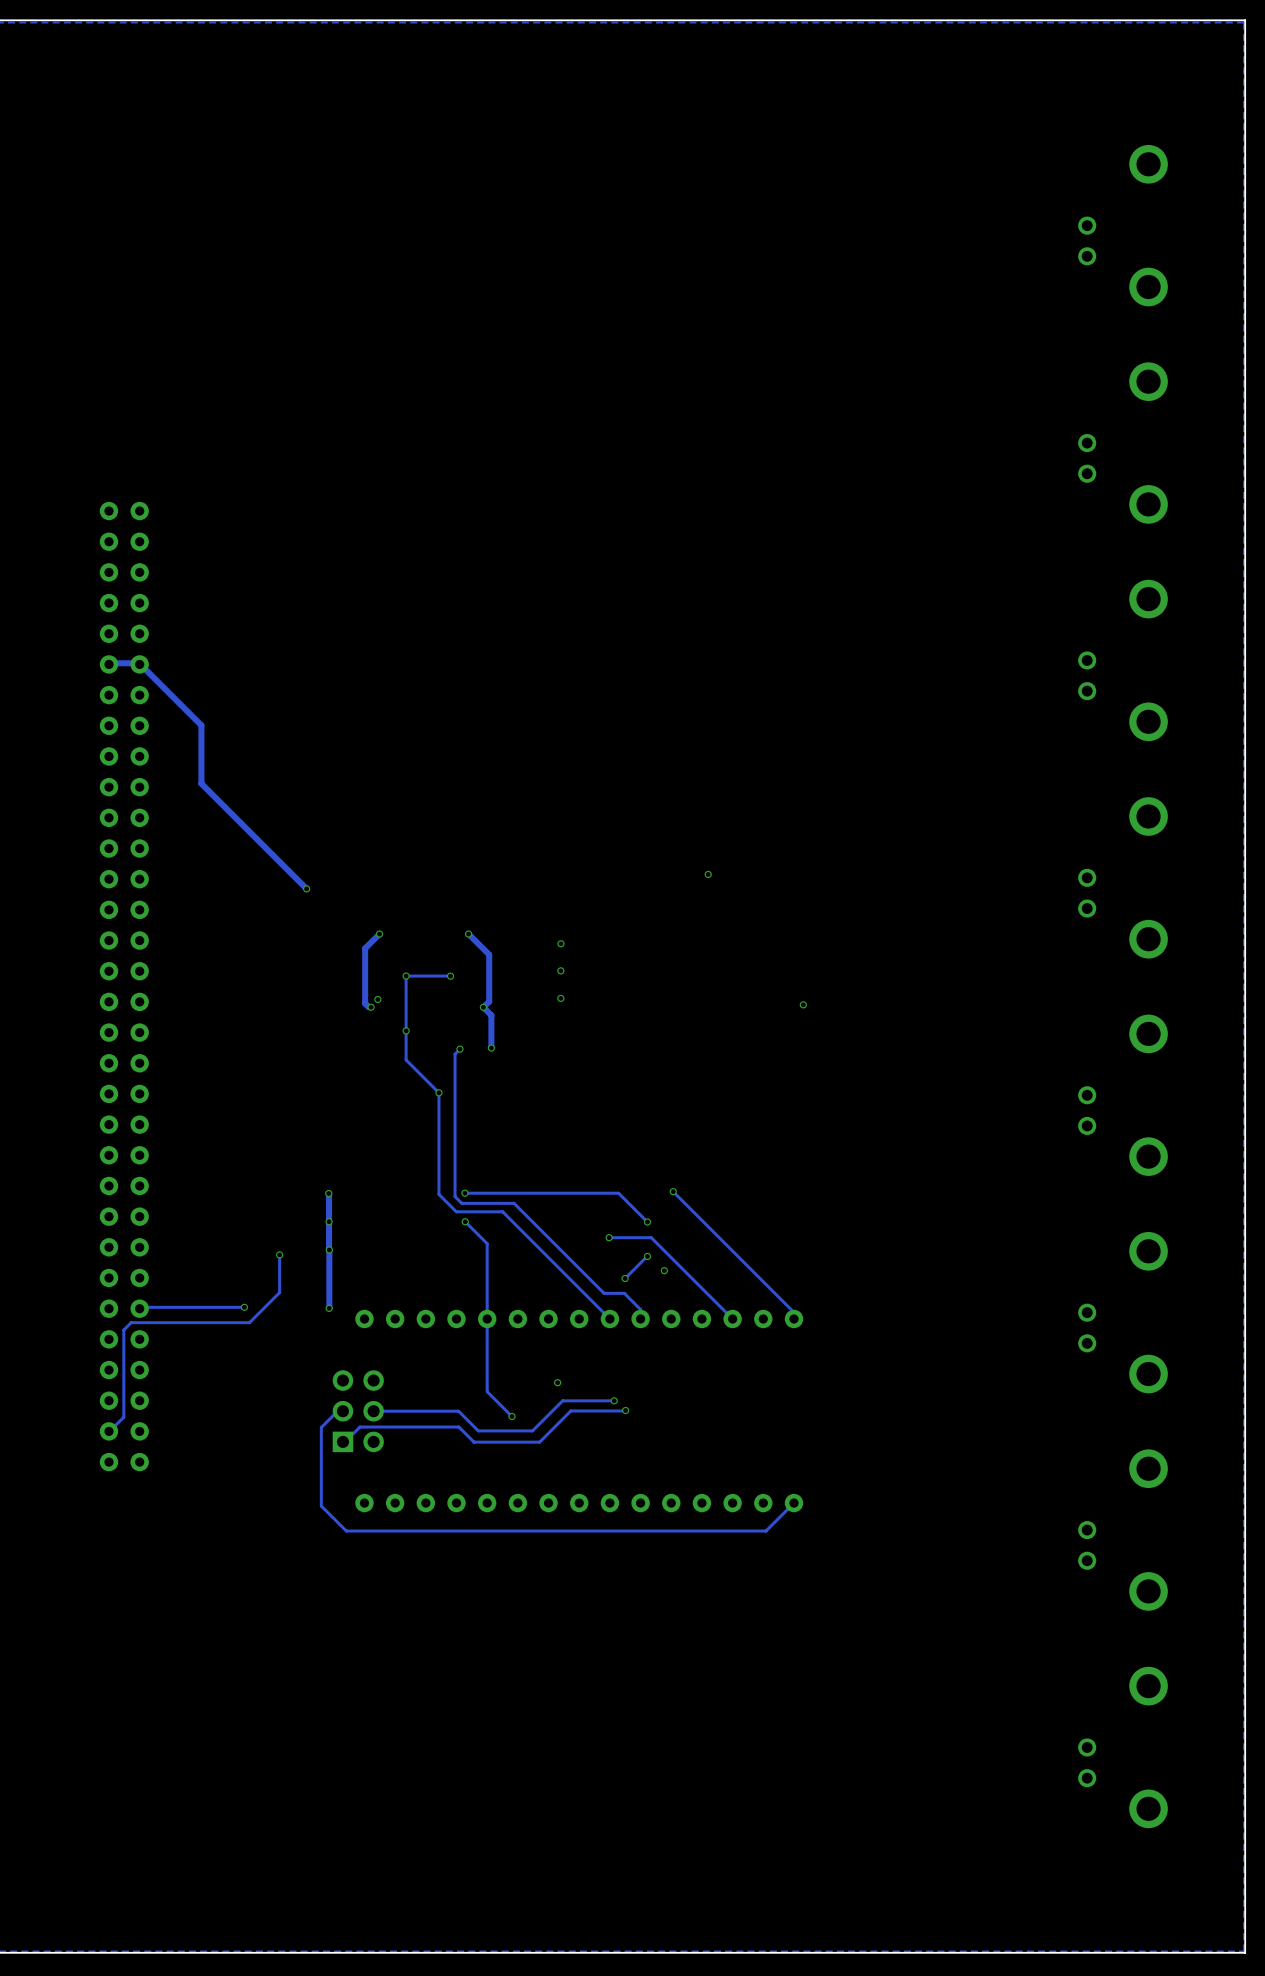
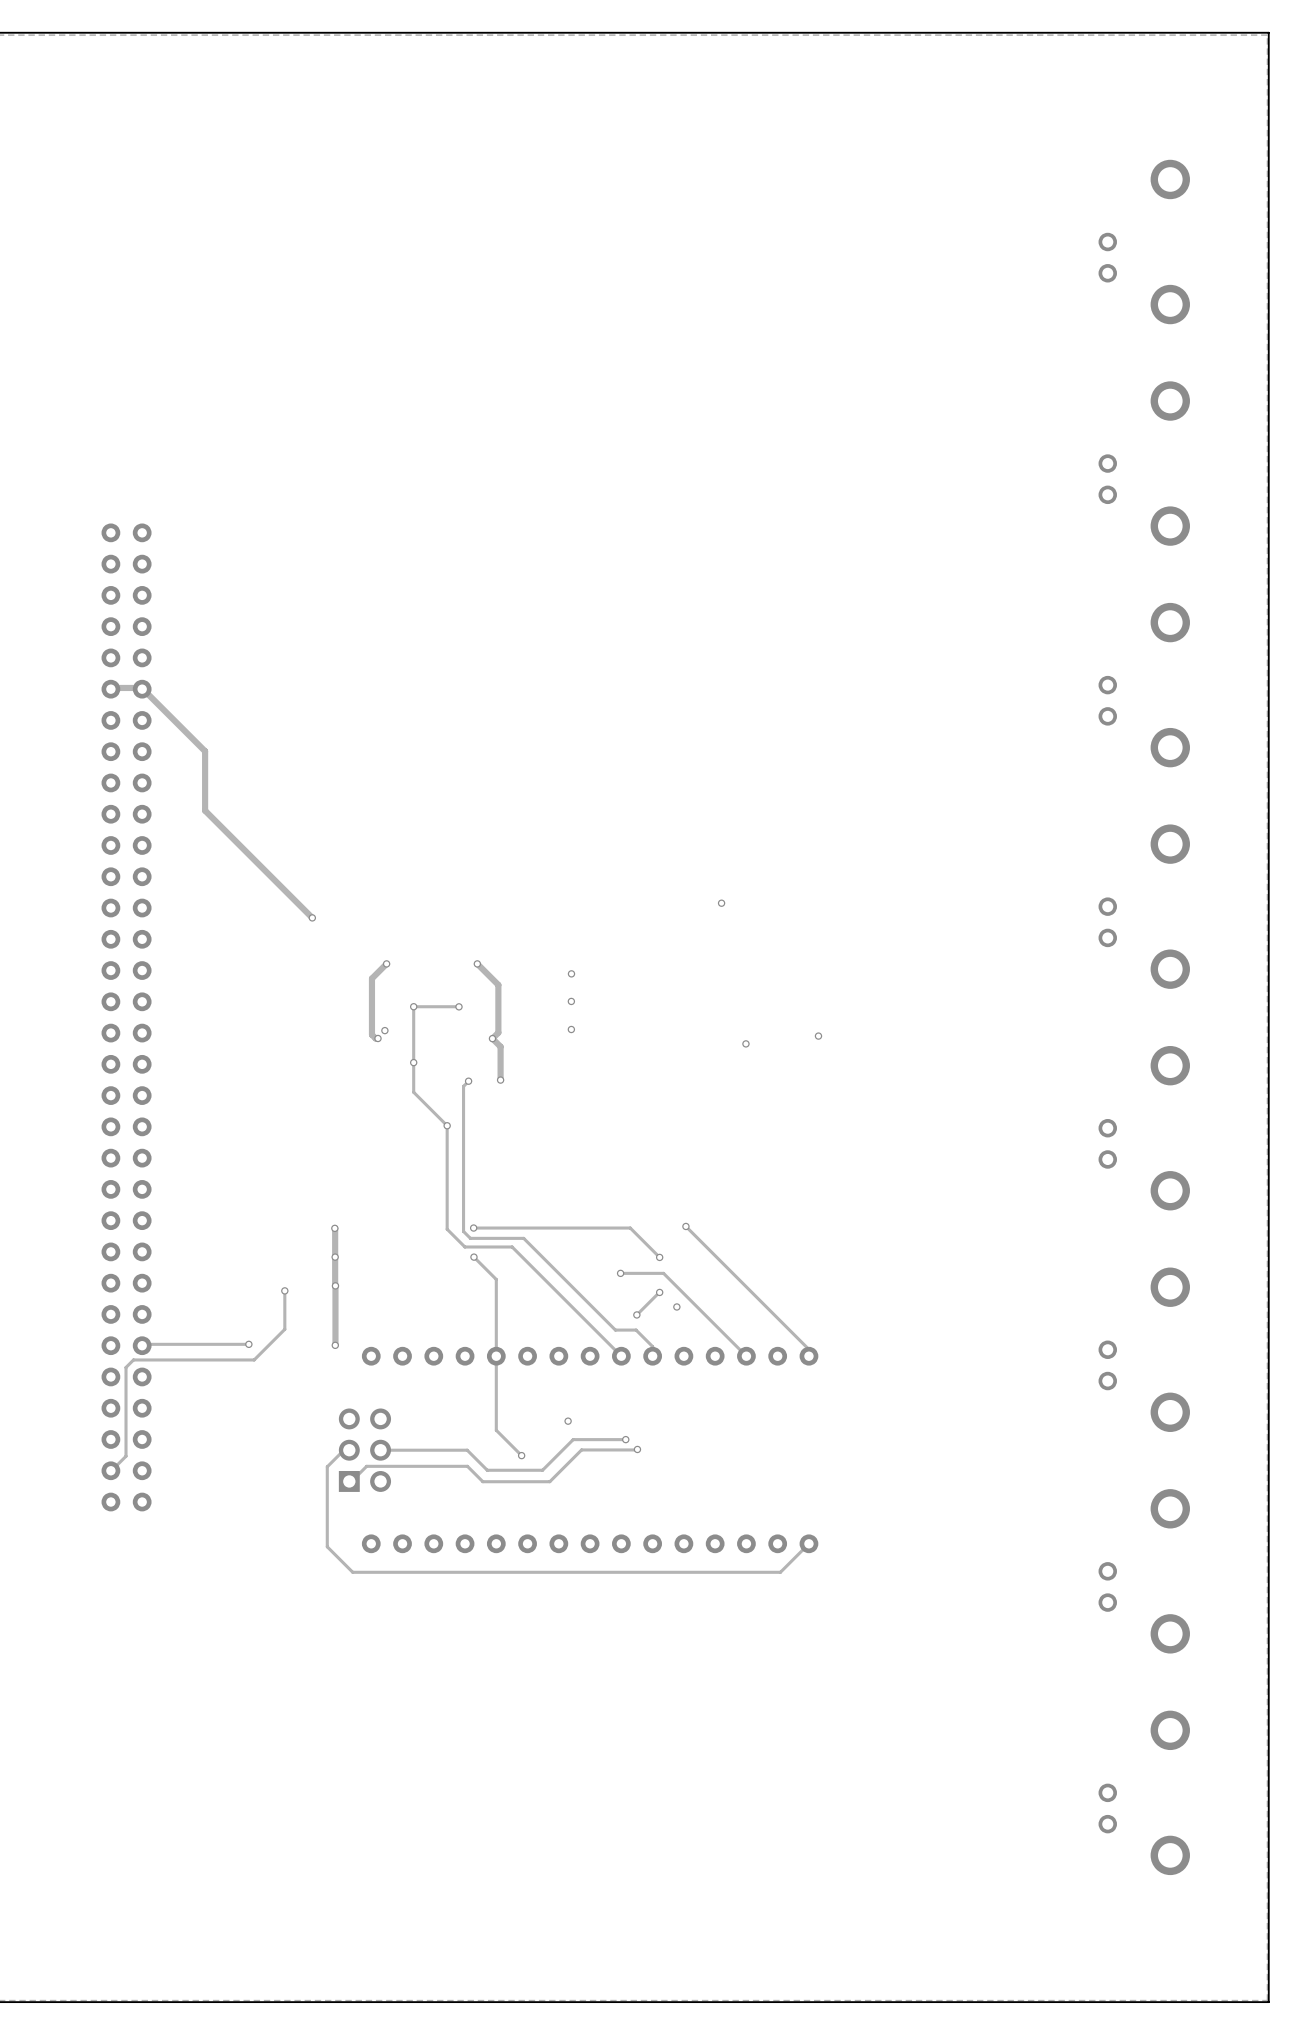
via: none -> (745, 1043)

